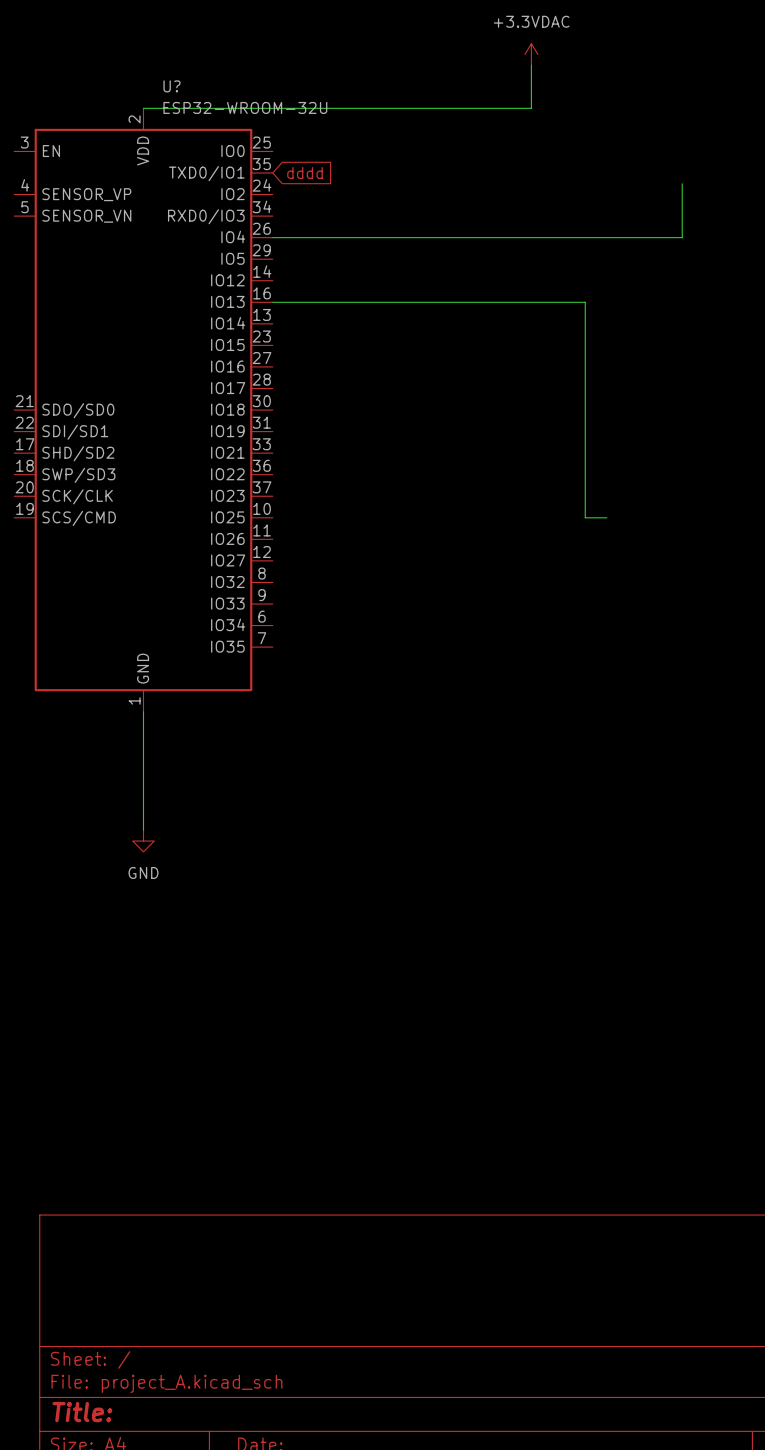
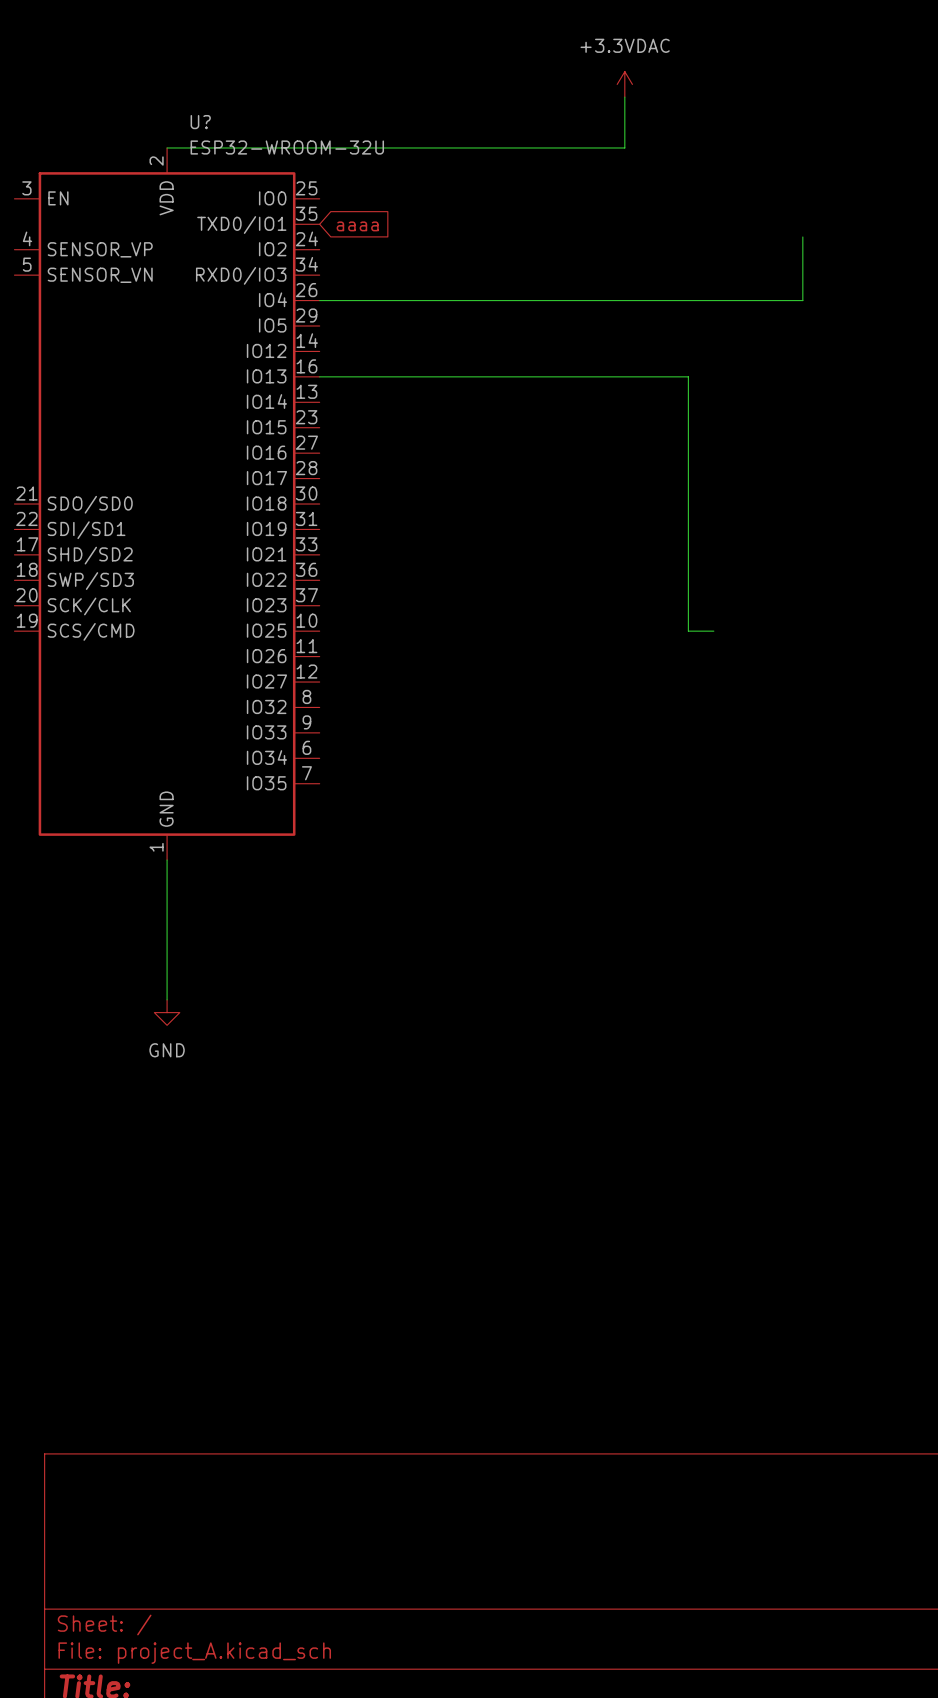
global label: dddd (305, 172) -> aaaa (357, 226)

